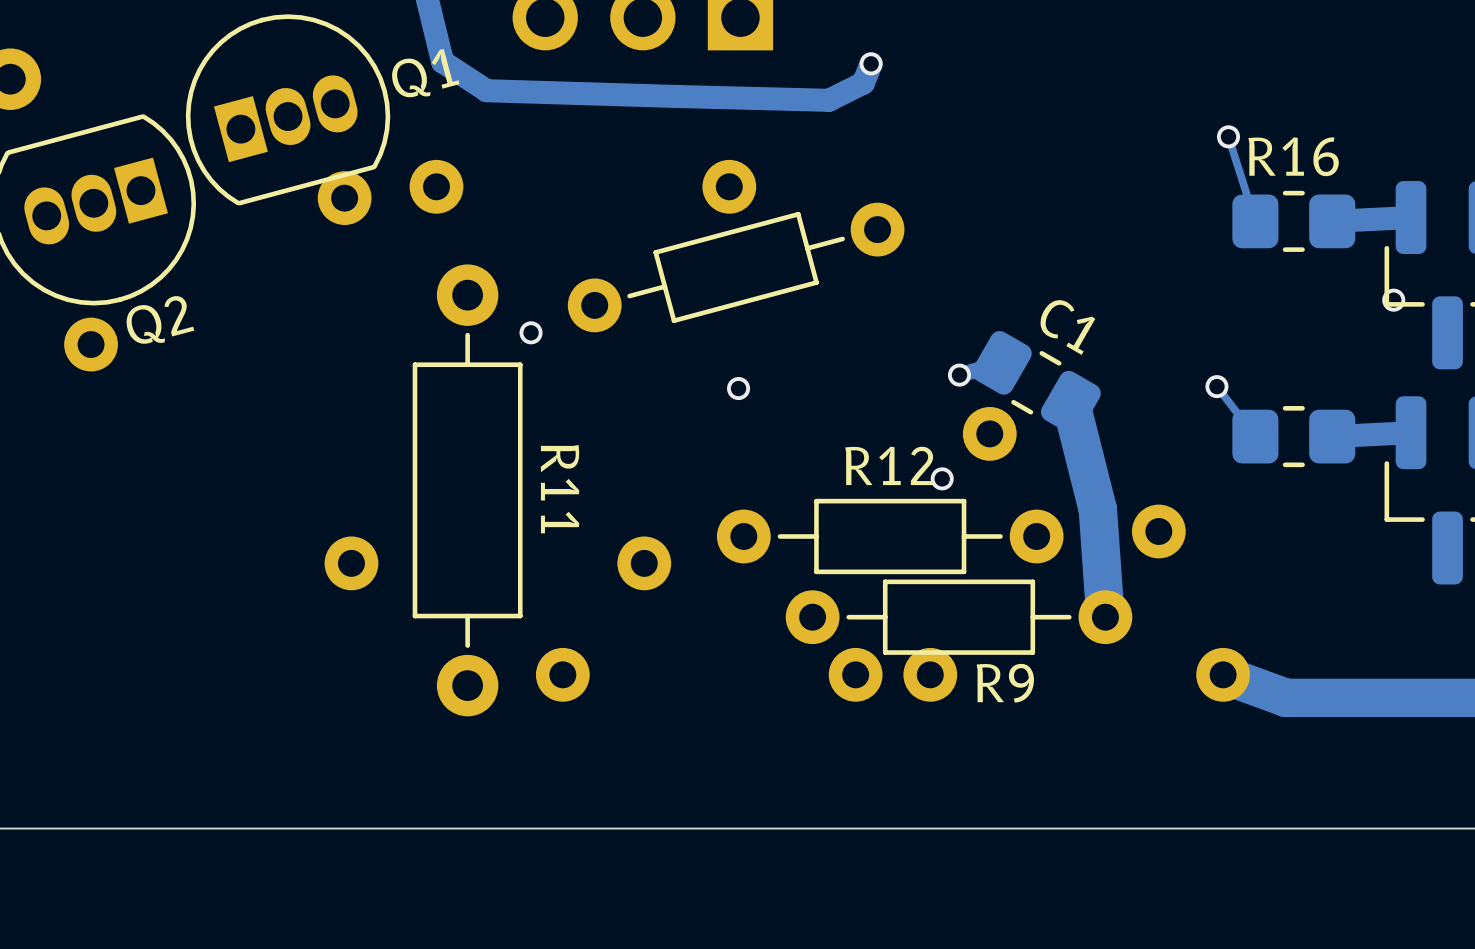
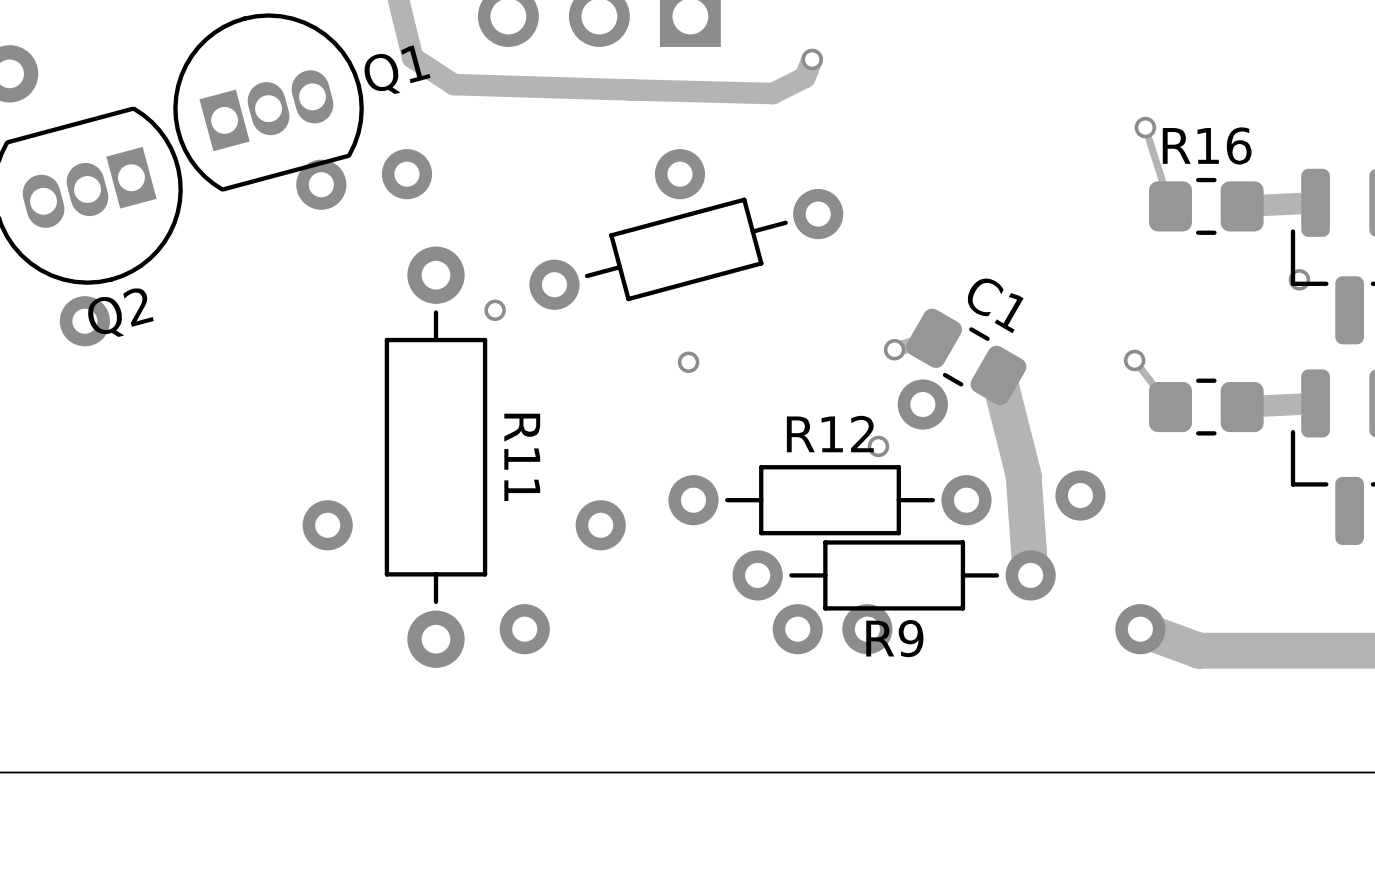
Q2 name position: Q2 (160, 319) -> Q2 (120, 312)
R9 name position: R9 (1005, 683) -> R9 (894, 638)

